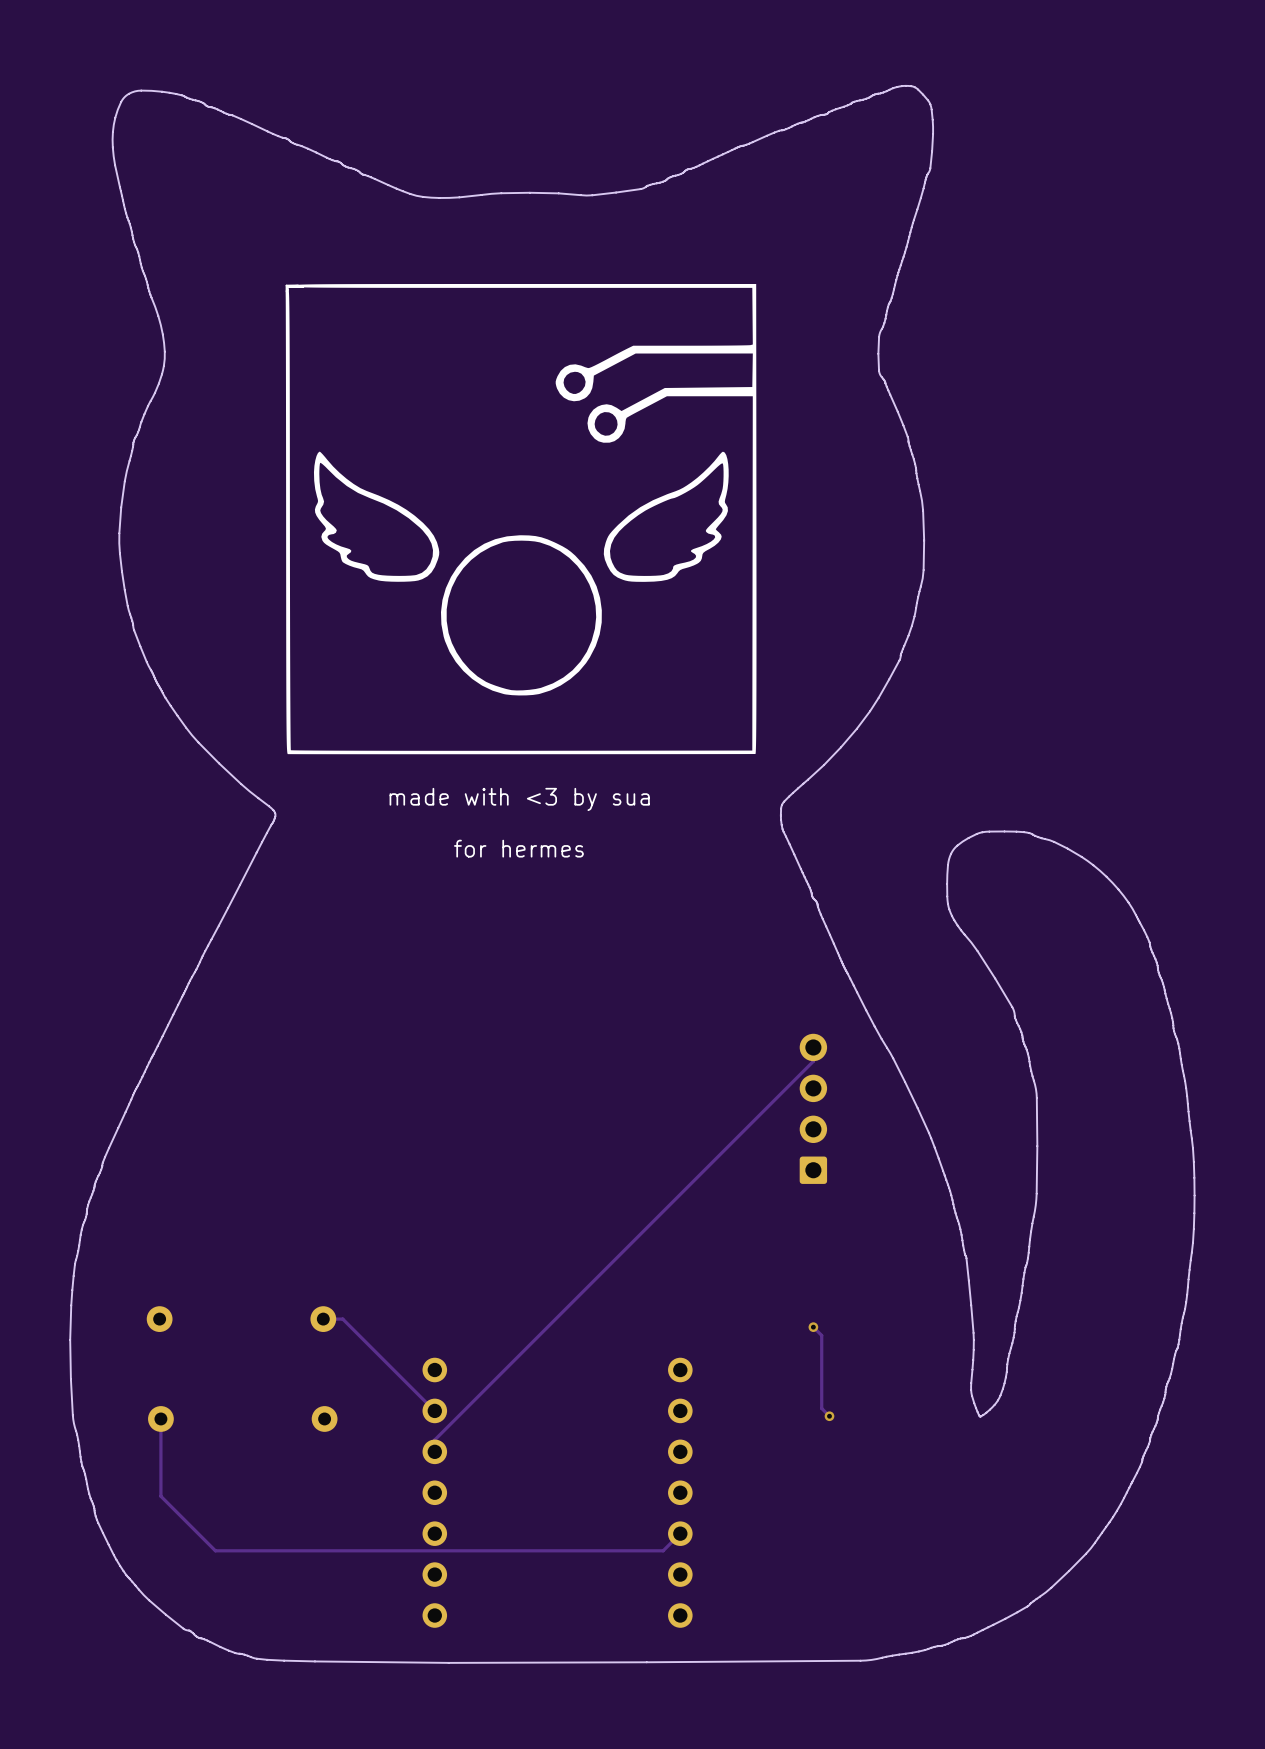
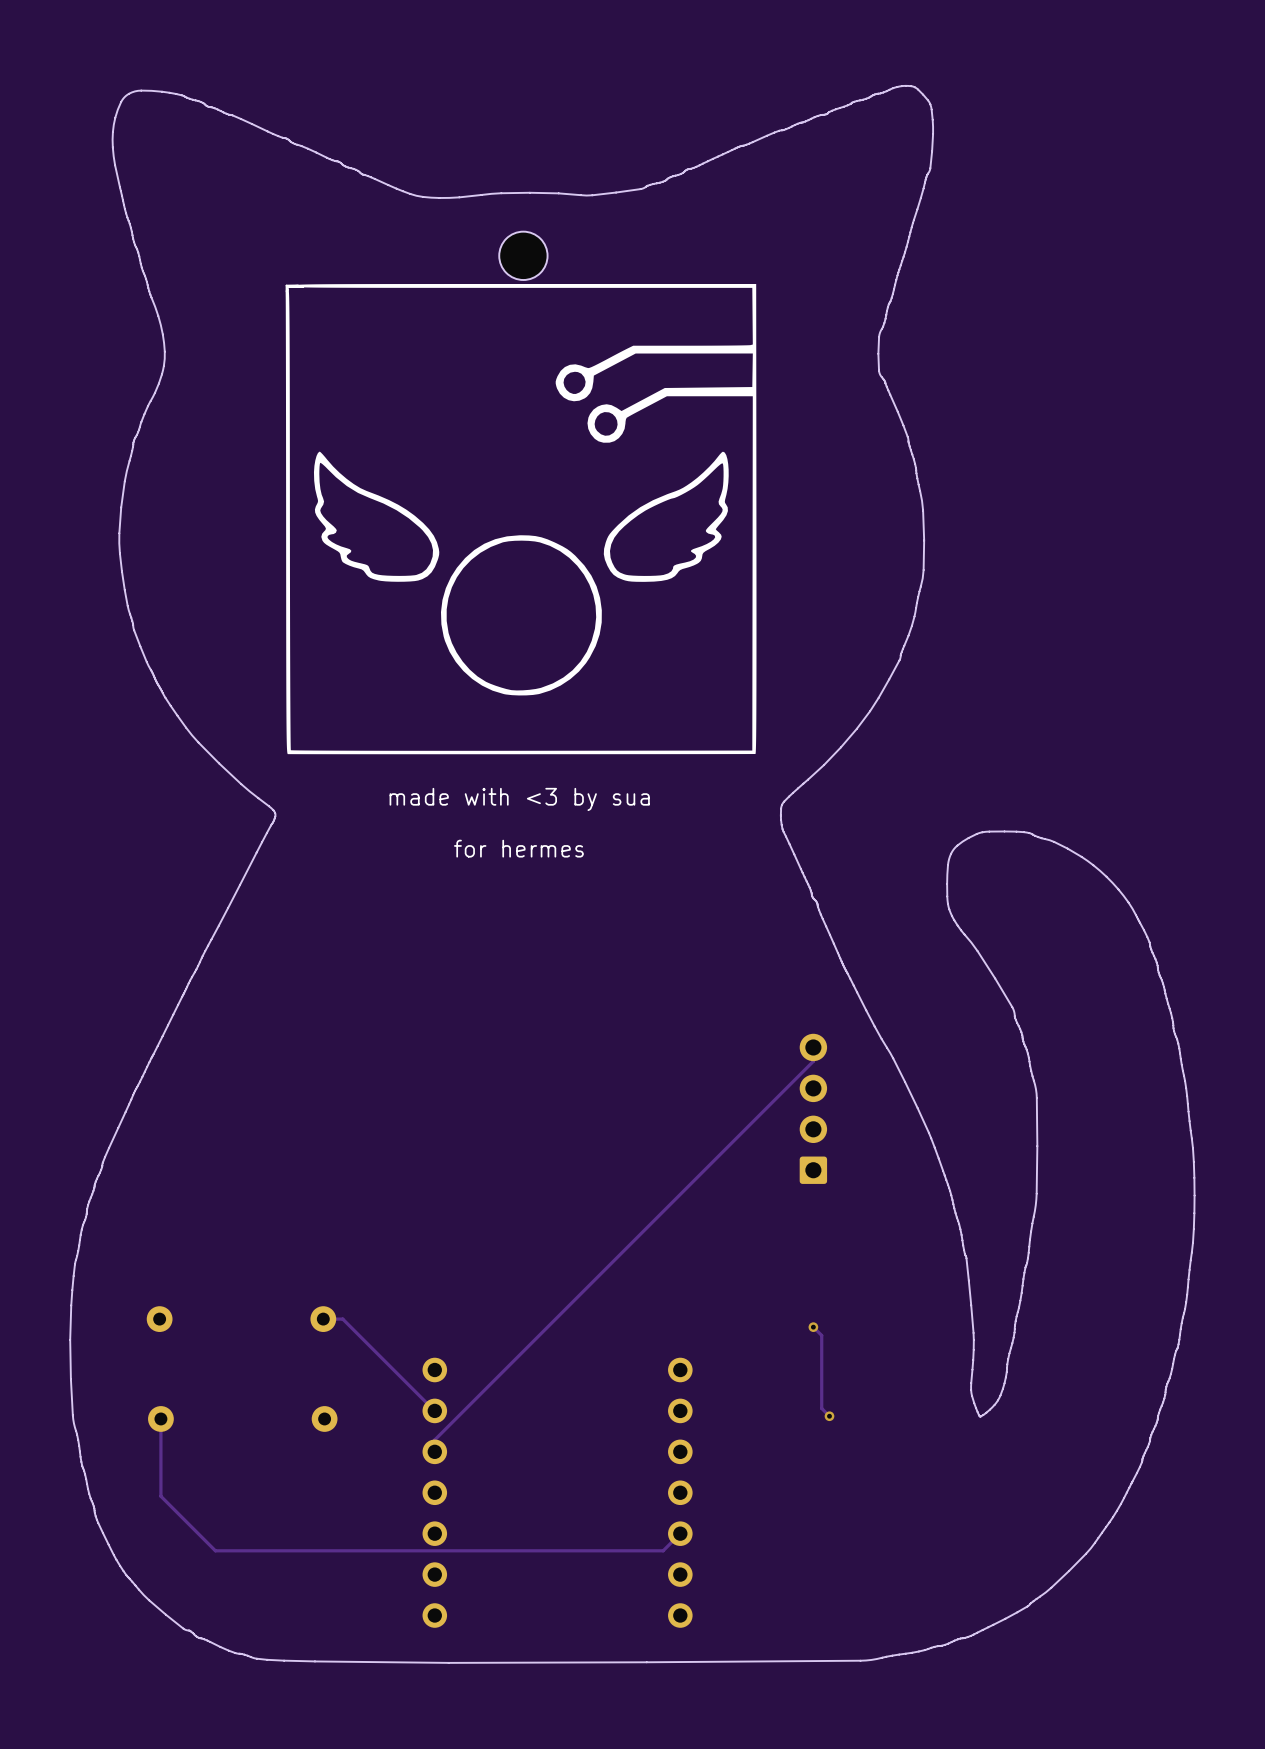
part: none -> (523, 255)

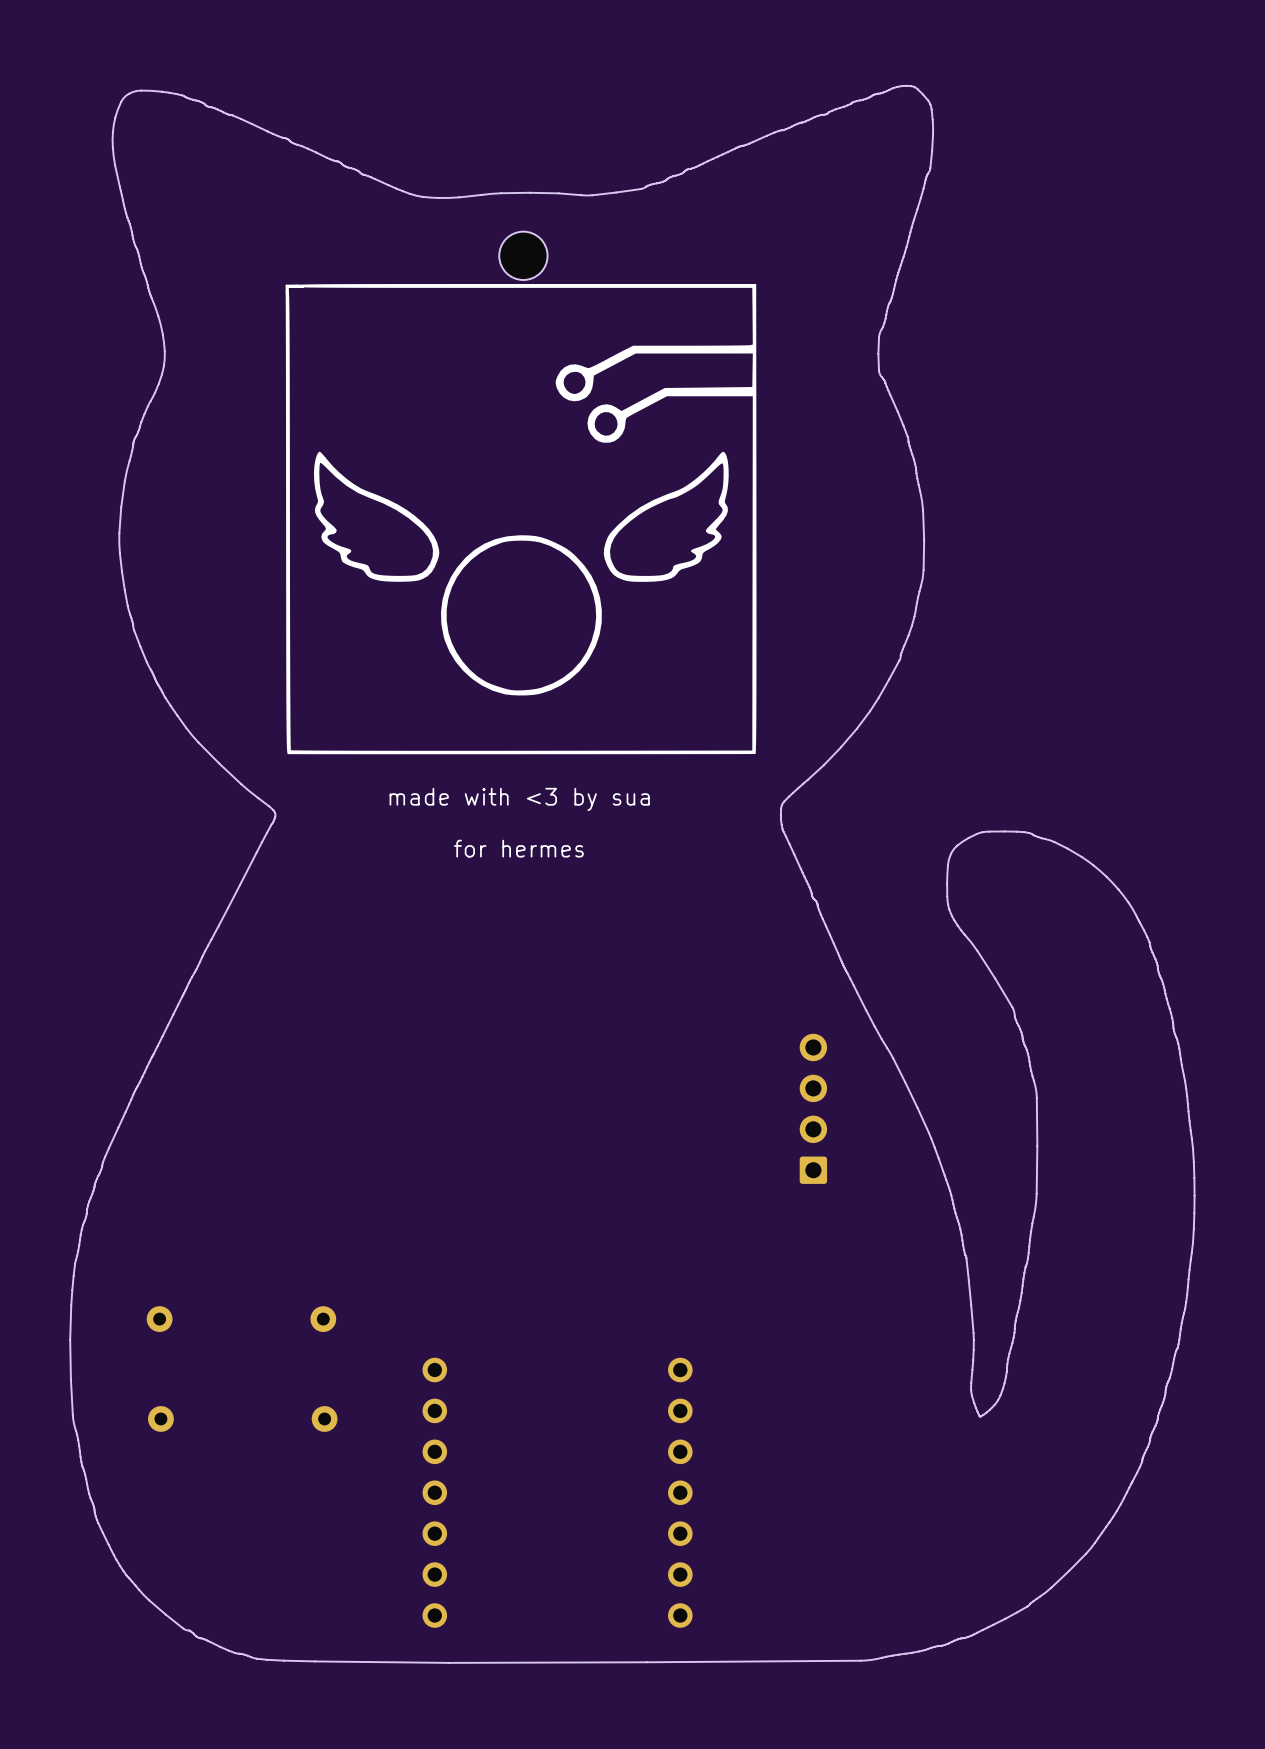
track: (813, 1047) (813, 1061) (434, 1439) (434, 1451) -> none
track: (323, 1319) (342, 1319) (434, 1410) -> none
track: (813, 1327) (821, 1335) (821, 1408) (829, 1416) -> none
via: (813, 1327) -> none
via: (829, 1416) -> none
track: (160, 1418) (160, 1496) (215, 1550) (663, 1550) (680, 1533) -> none

